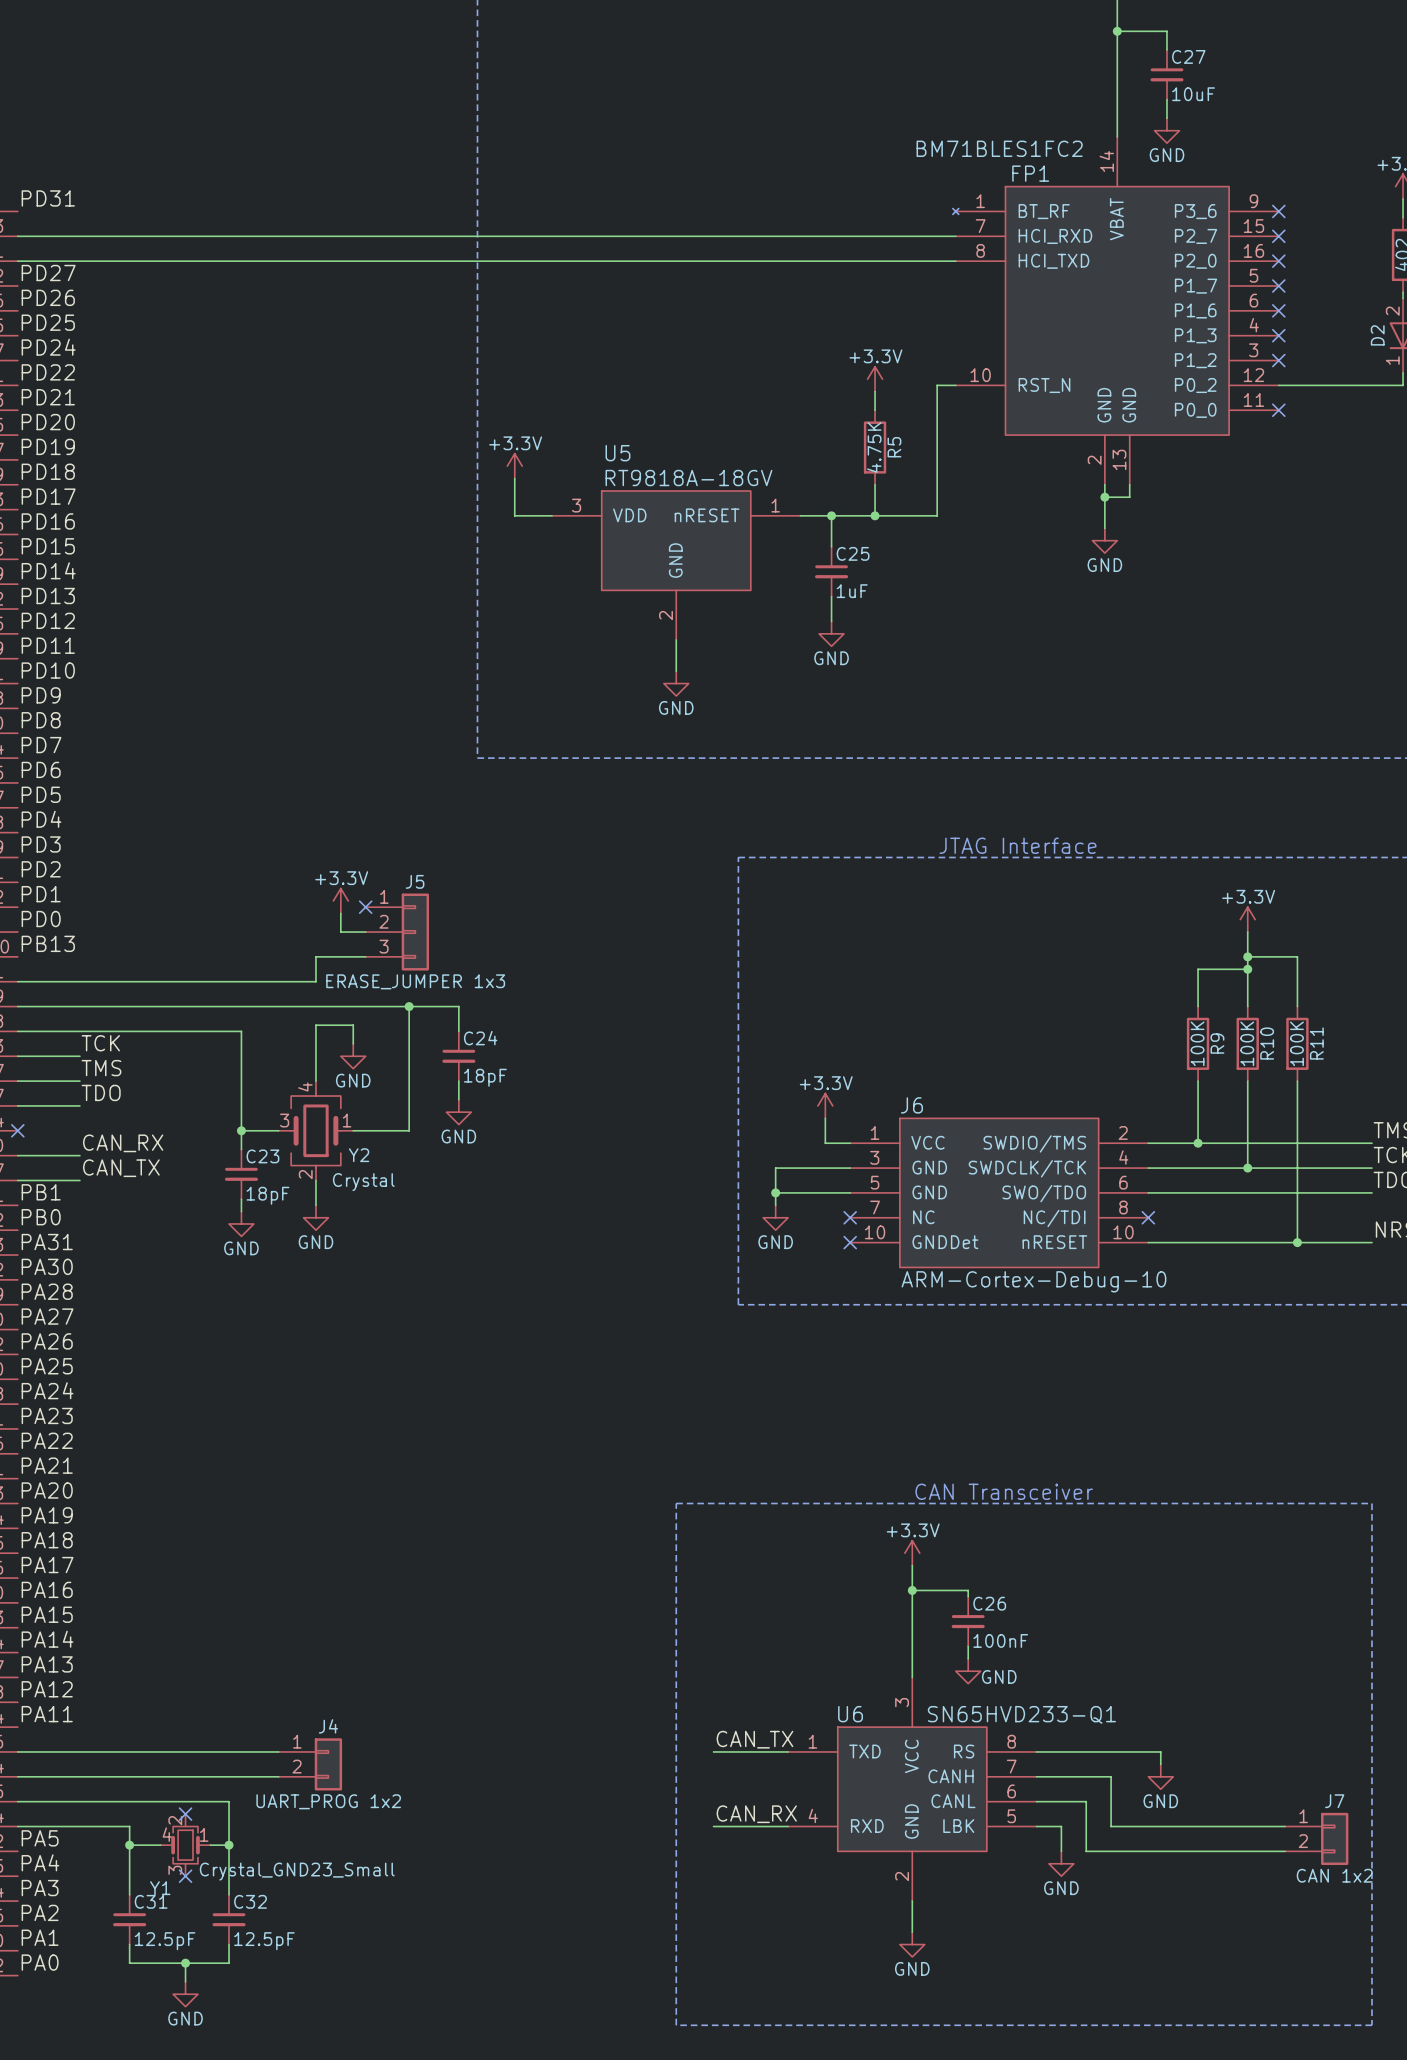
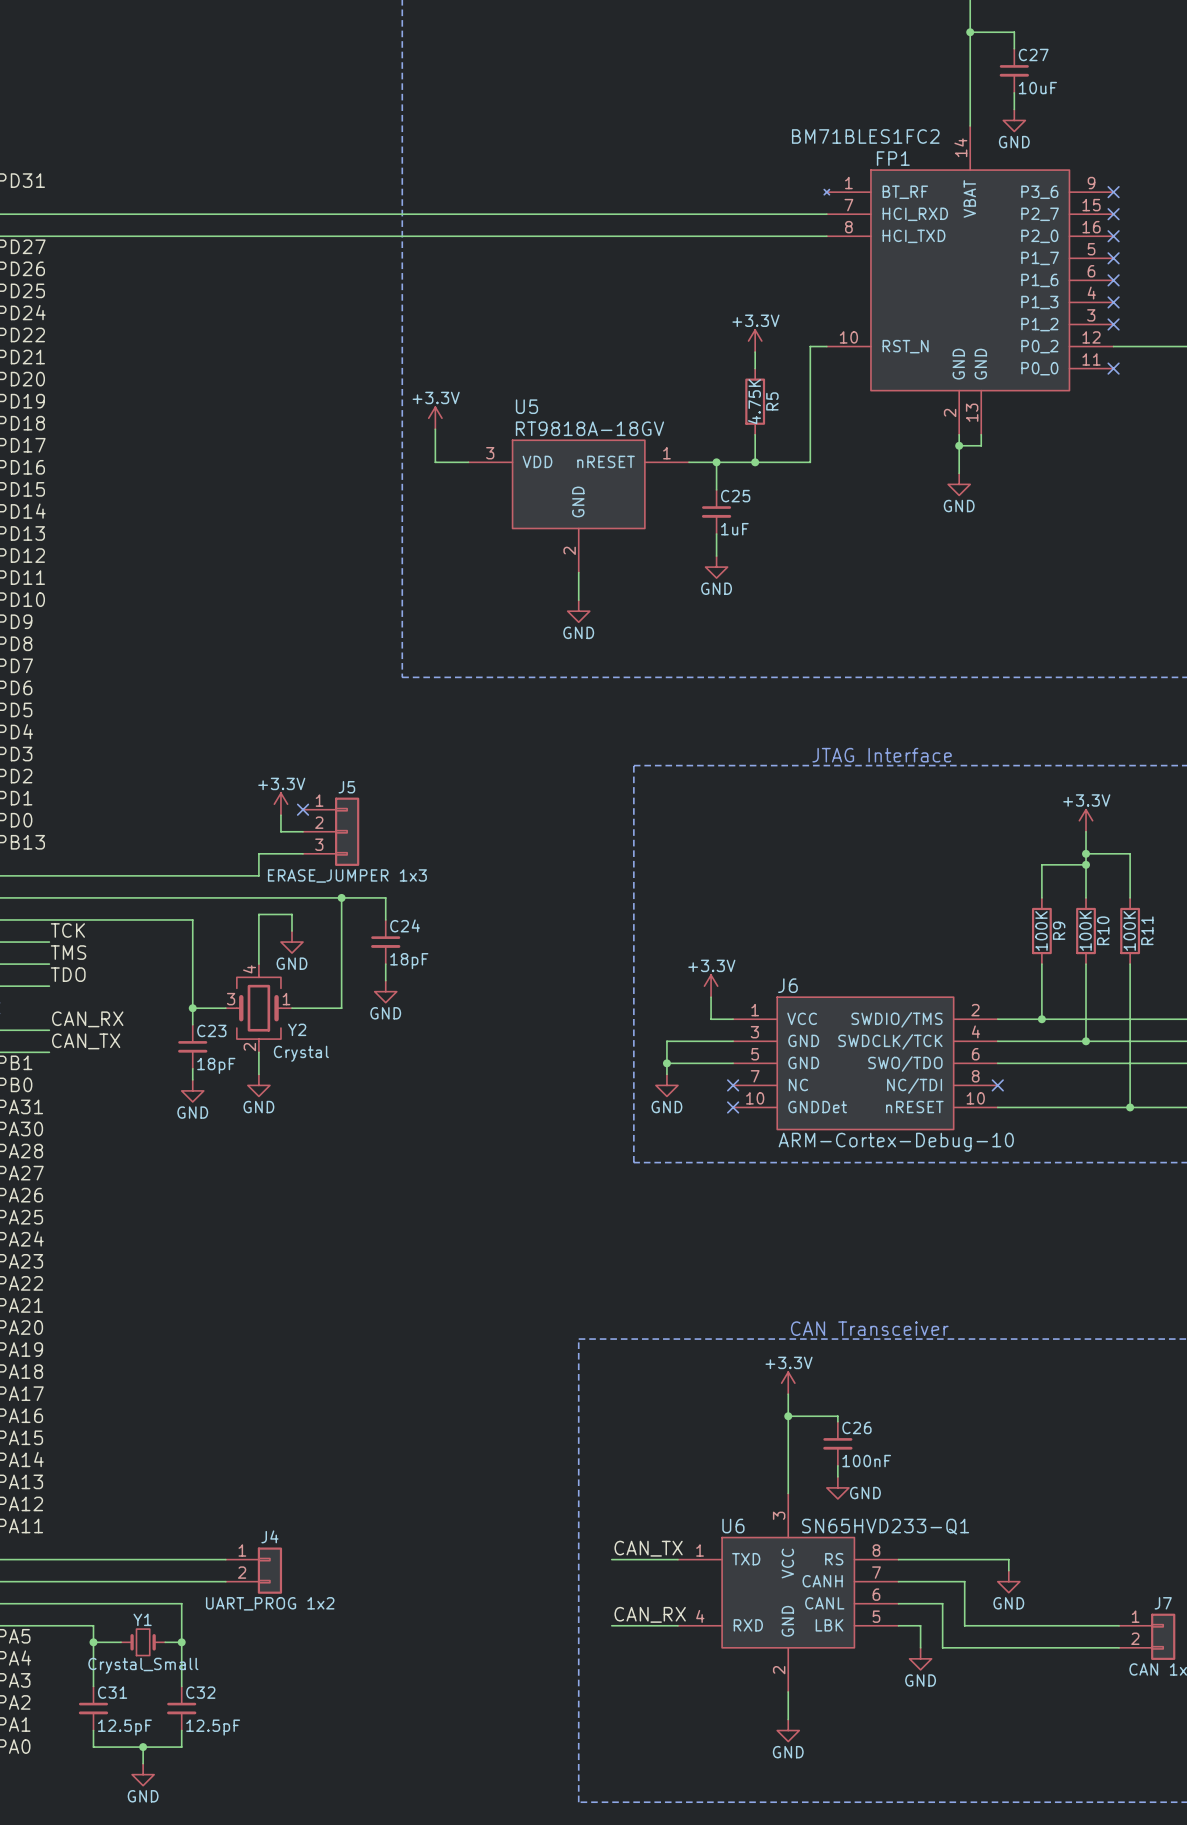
Y1 symbol: [160, 1814, 211, 1877] -> [121, 1629, 166, 1656]
no-connect mark: (185, 1814) -> none
Y1 value: Crystal_GND23_Small (297, 1871) -> Crystal_Small (143, 1665)
no-connect mark: (185, 1876) -> none
Y1 name position: Y1 (160, 1888) -> Y1 (142, 1619)

